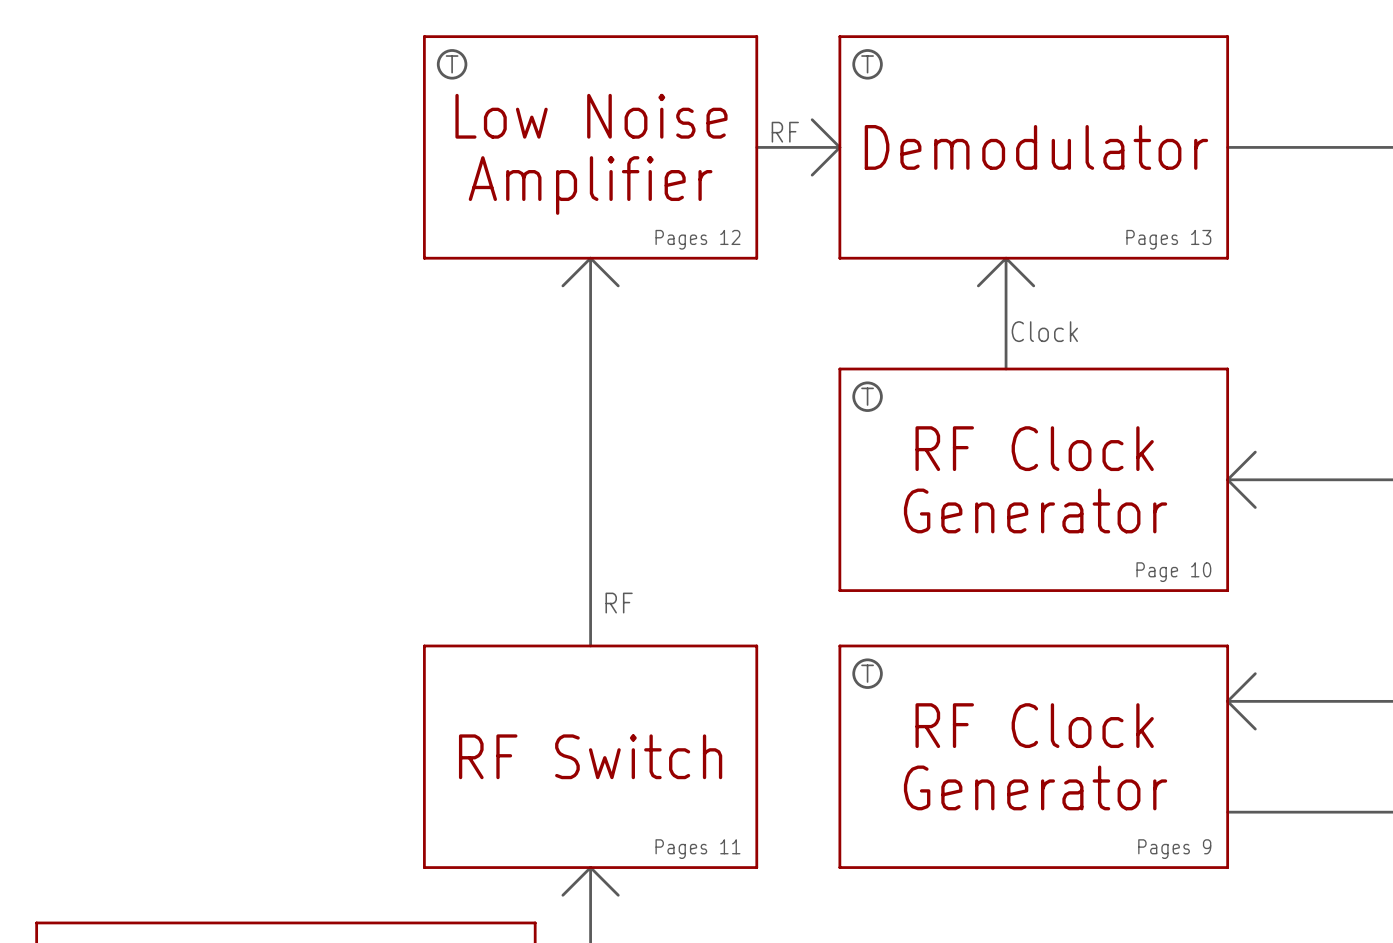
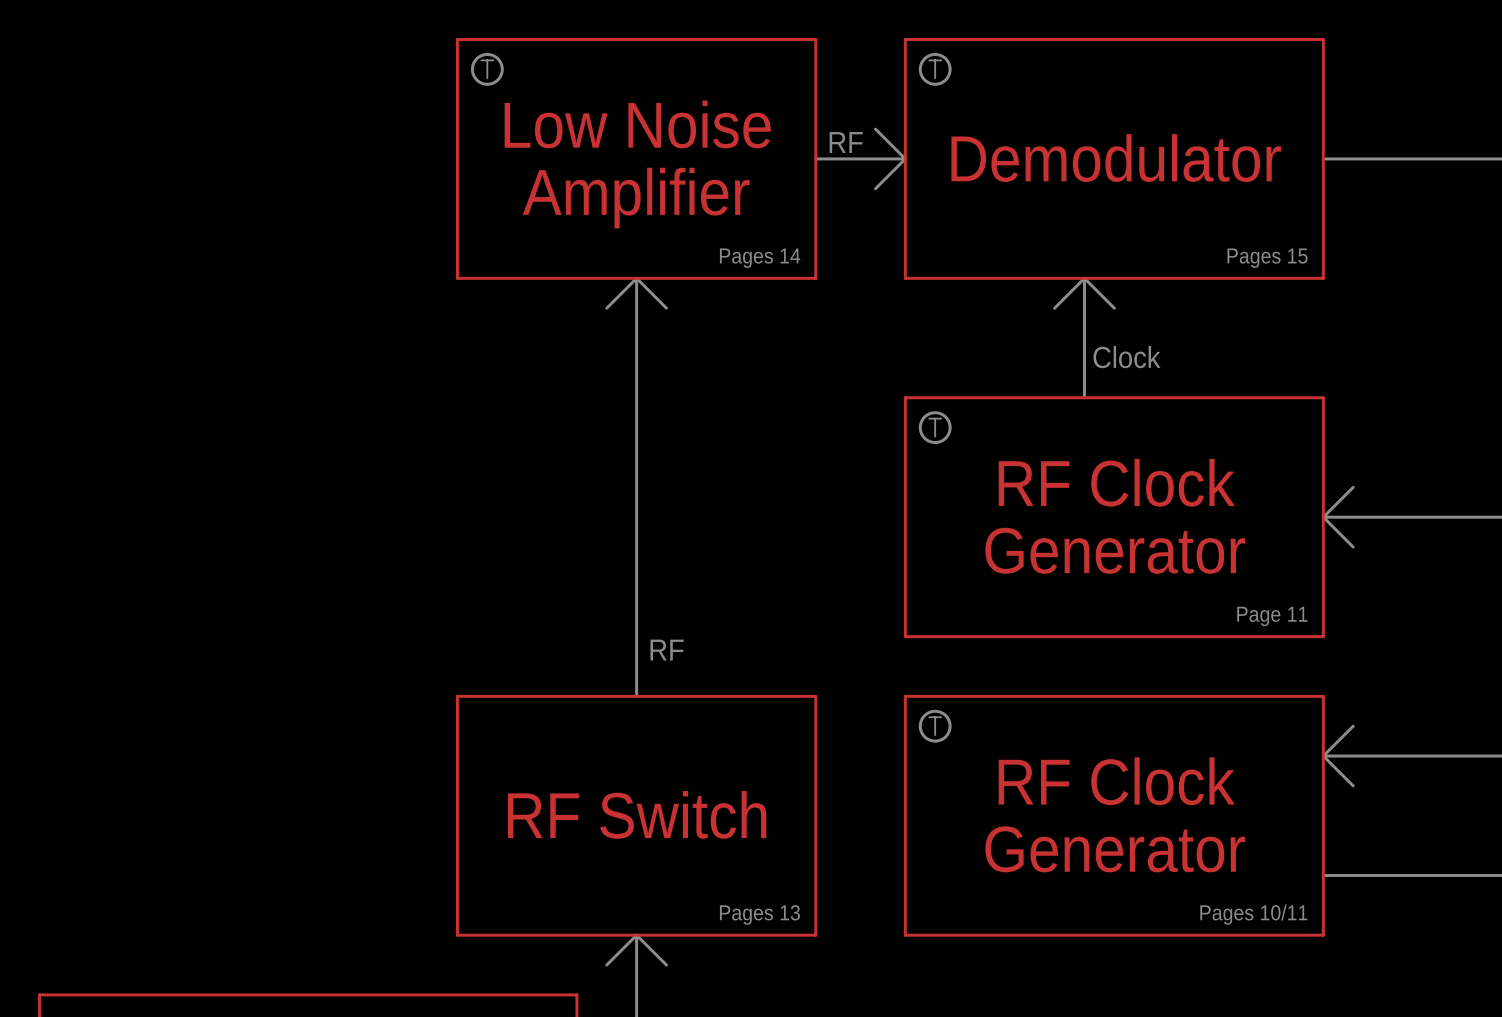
text: Pages 12 (697, 239) -> Pages 14 (760, 258)
text: Pages 13 (1168, 239) -> Pages 15 (1267, 258)
text: Page 10 (1173, 572) -> Page 11 (1272, 616)
text: Pages 11 (697, 849) -> Pages 13 (759, 914)
text: Pages 9 (1174, 849) -> Pages 10/11 (1253, 914)

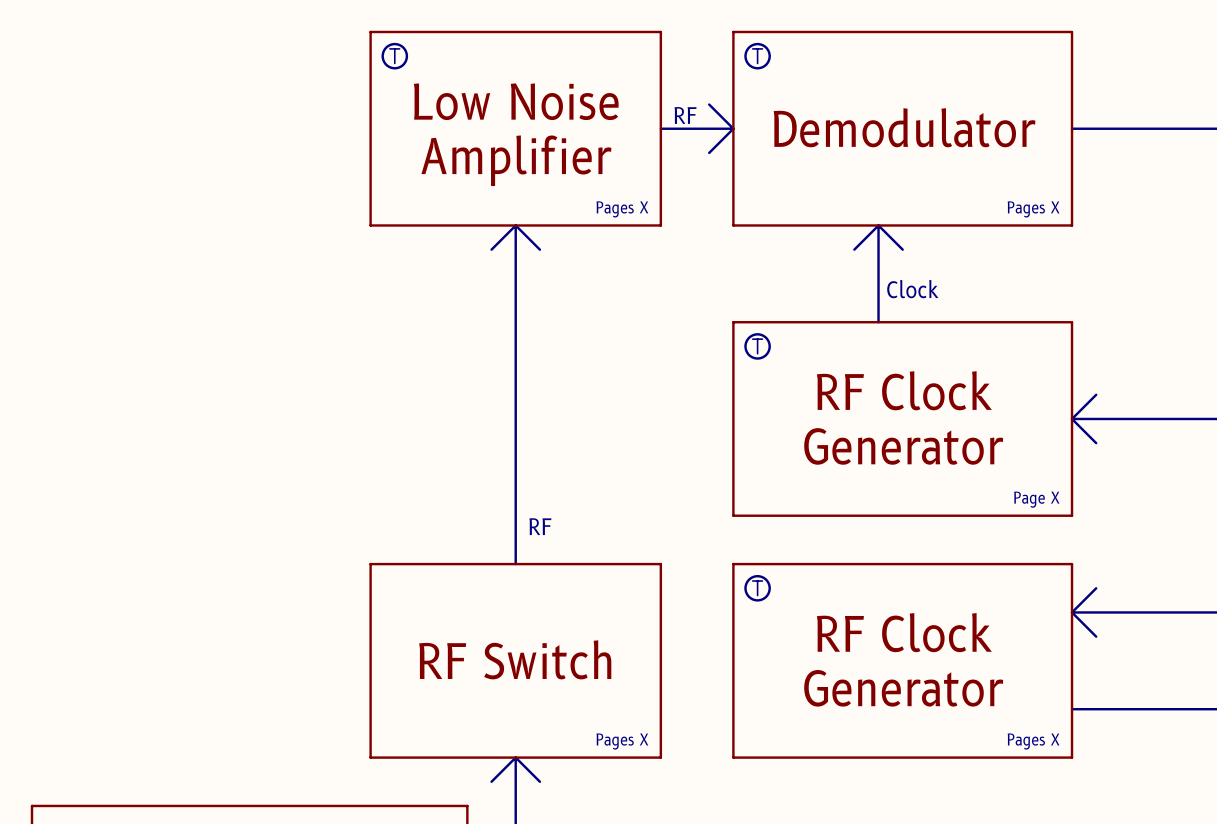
text: Pages 14 (760, 258) -> Pages X (622, 209)
text: Pages 15 (1267, 258) -> Pages X (1033, 209)
text: Page 11 (1272, 616) -> Page X (1036, 499)
text: Pages 13 (759, 914) -> Pages X (622, 741)
text: Pages 10/11 (1253, 914) -> Pages X (1033, 741)

